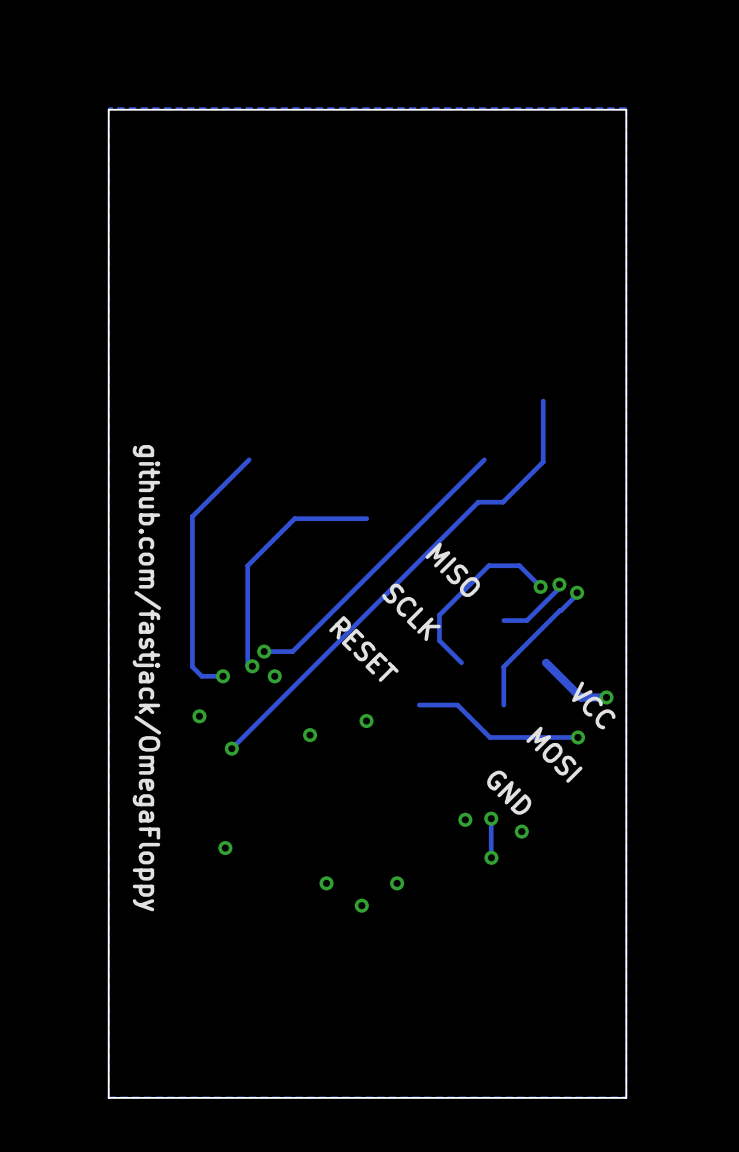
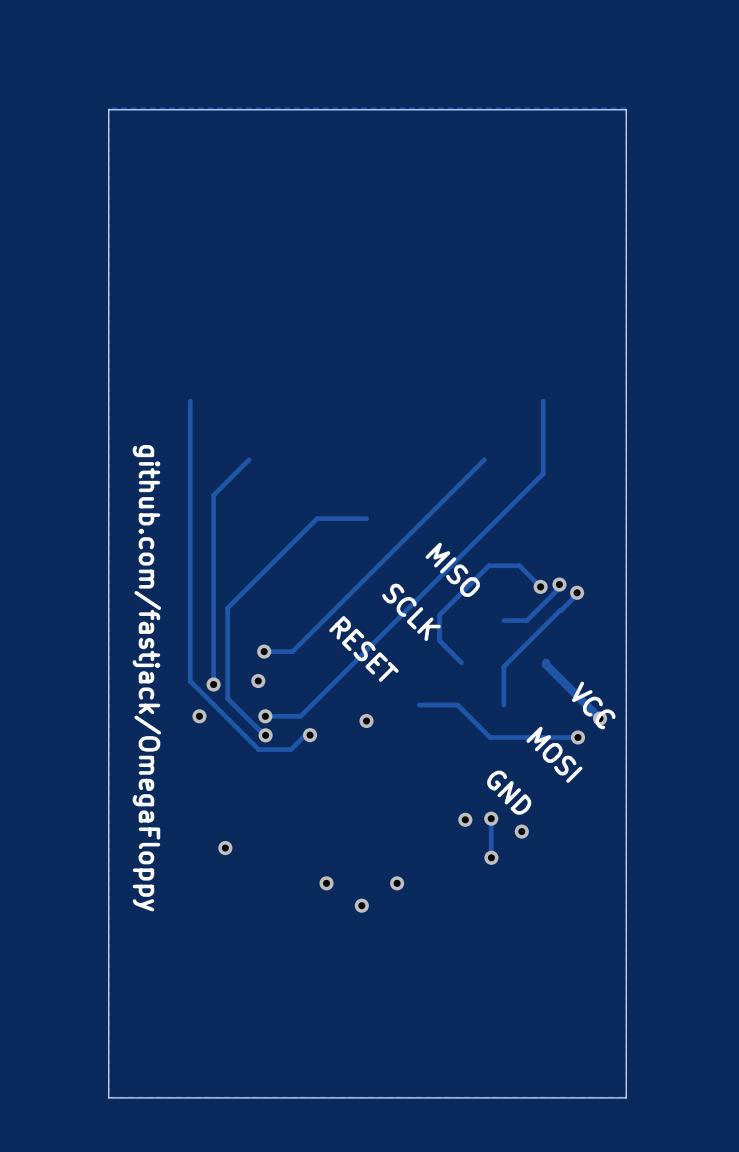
track: none -> (190, 401) (190, 681) (258, 749) (290, 749) (305, 735)
track: (543, 461) (502, 502) (478, 502) (231, 748) -> (543, 461) (543, 473) (300, 716) (265, 716)
track: (213, 495) (192, 516) (192, 666) (201, 676) (223, 676) -> (213, 495) (213, 684)
track: (317, 518) (294, 518) (247, 565) (247, 665) (252, 666) -> (317, 518) (227, 608) (227, 698) (265, 735)
track: (546, 662) (580, 697) (606, 697) -> (546, 662) (600, 718)
via: (252, 666) -> none
via position: (223, 676) -> (213, 684)
via: (274, 676) -> none
via: none -> (258, 681)
via position: (606, 697) -> (600, 718)
via: none -> (265, 716)
via: none -> (265, 735)
via: (231, 748) -> none

